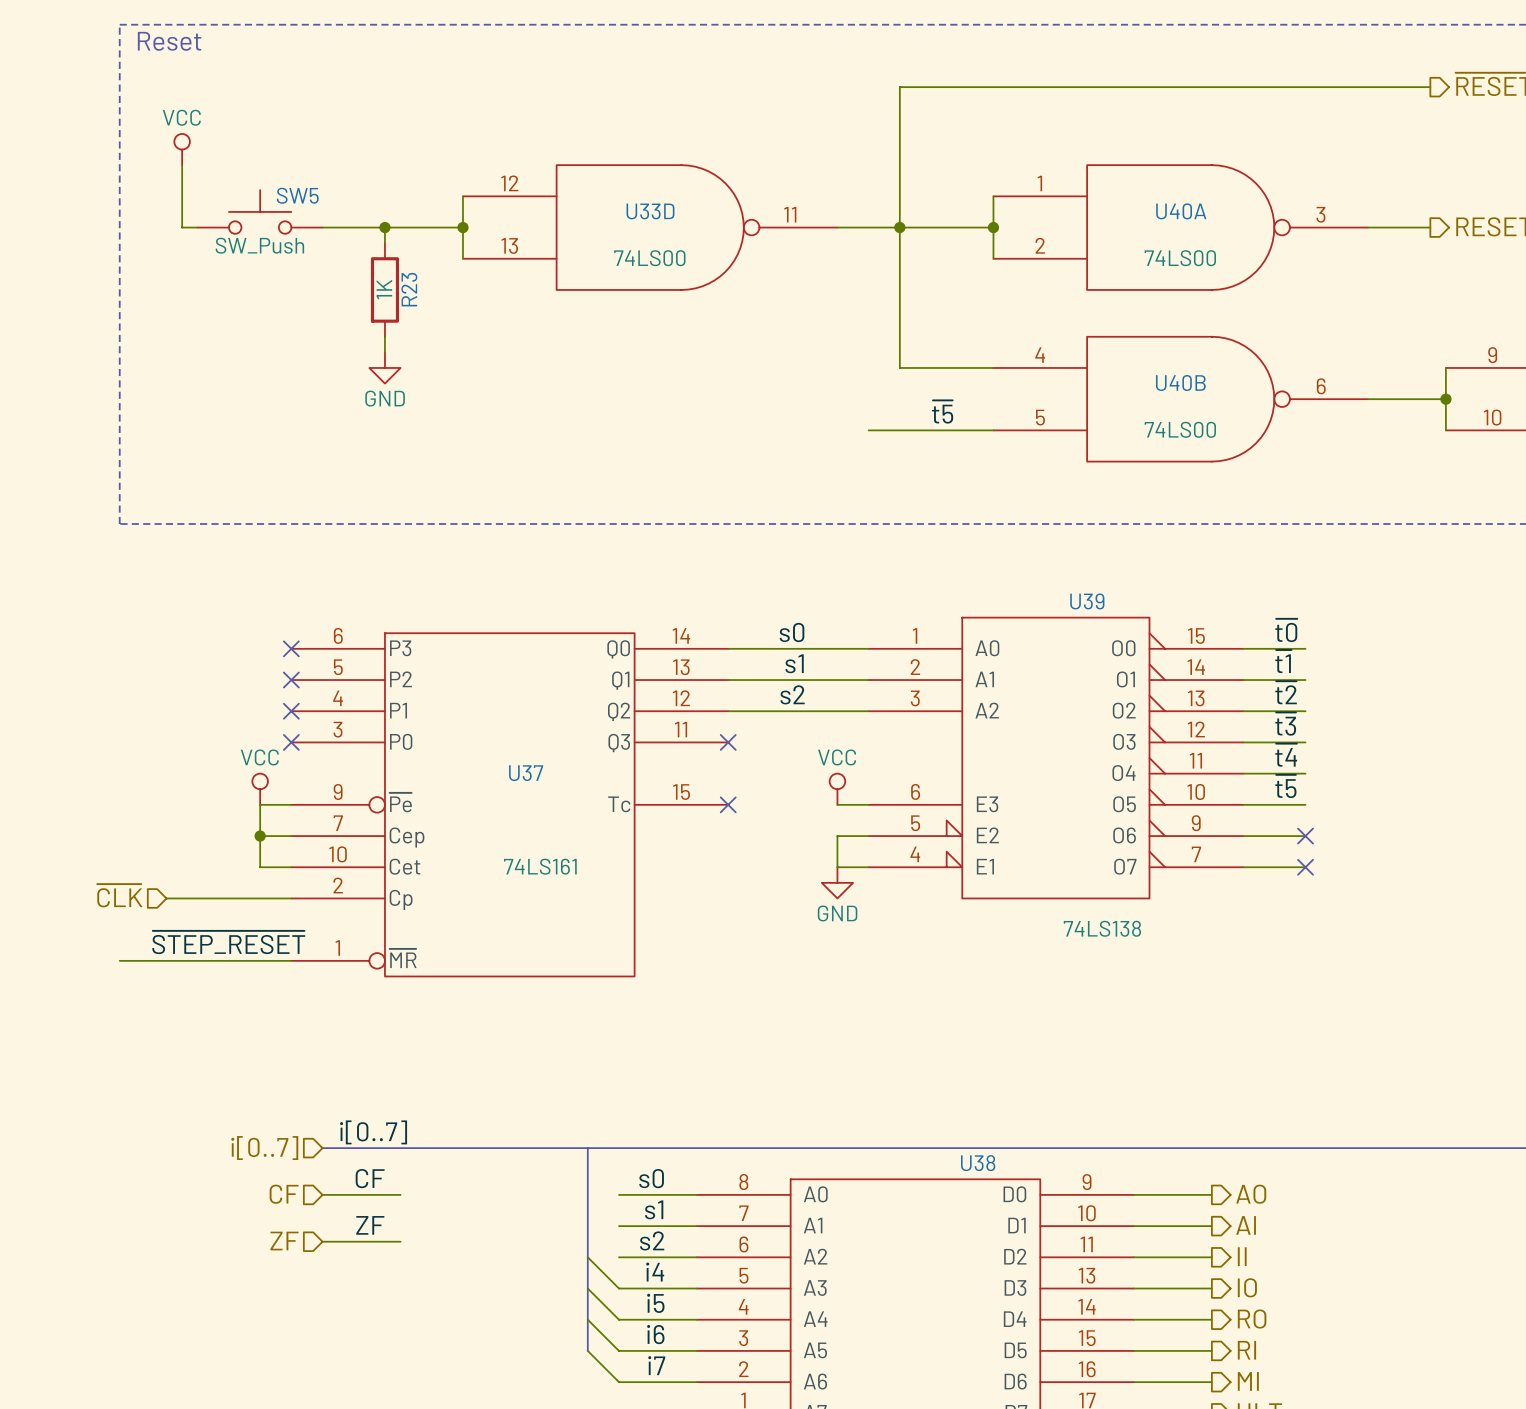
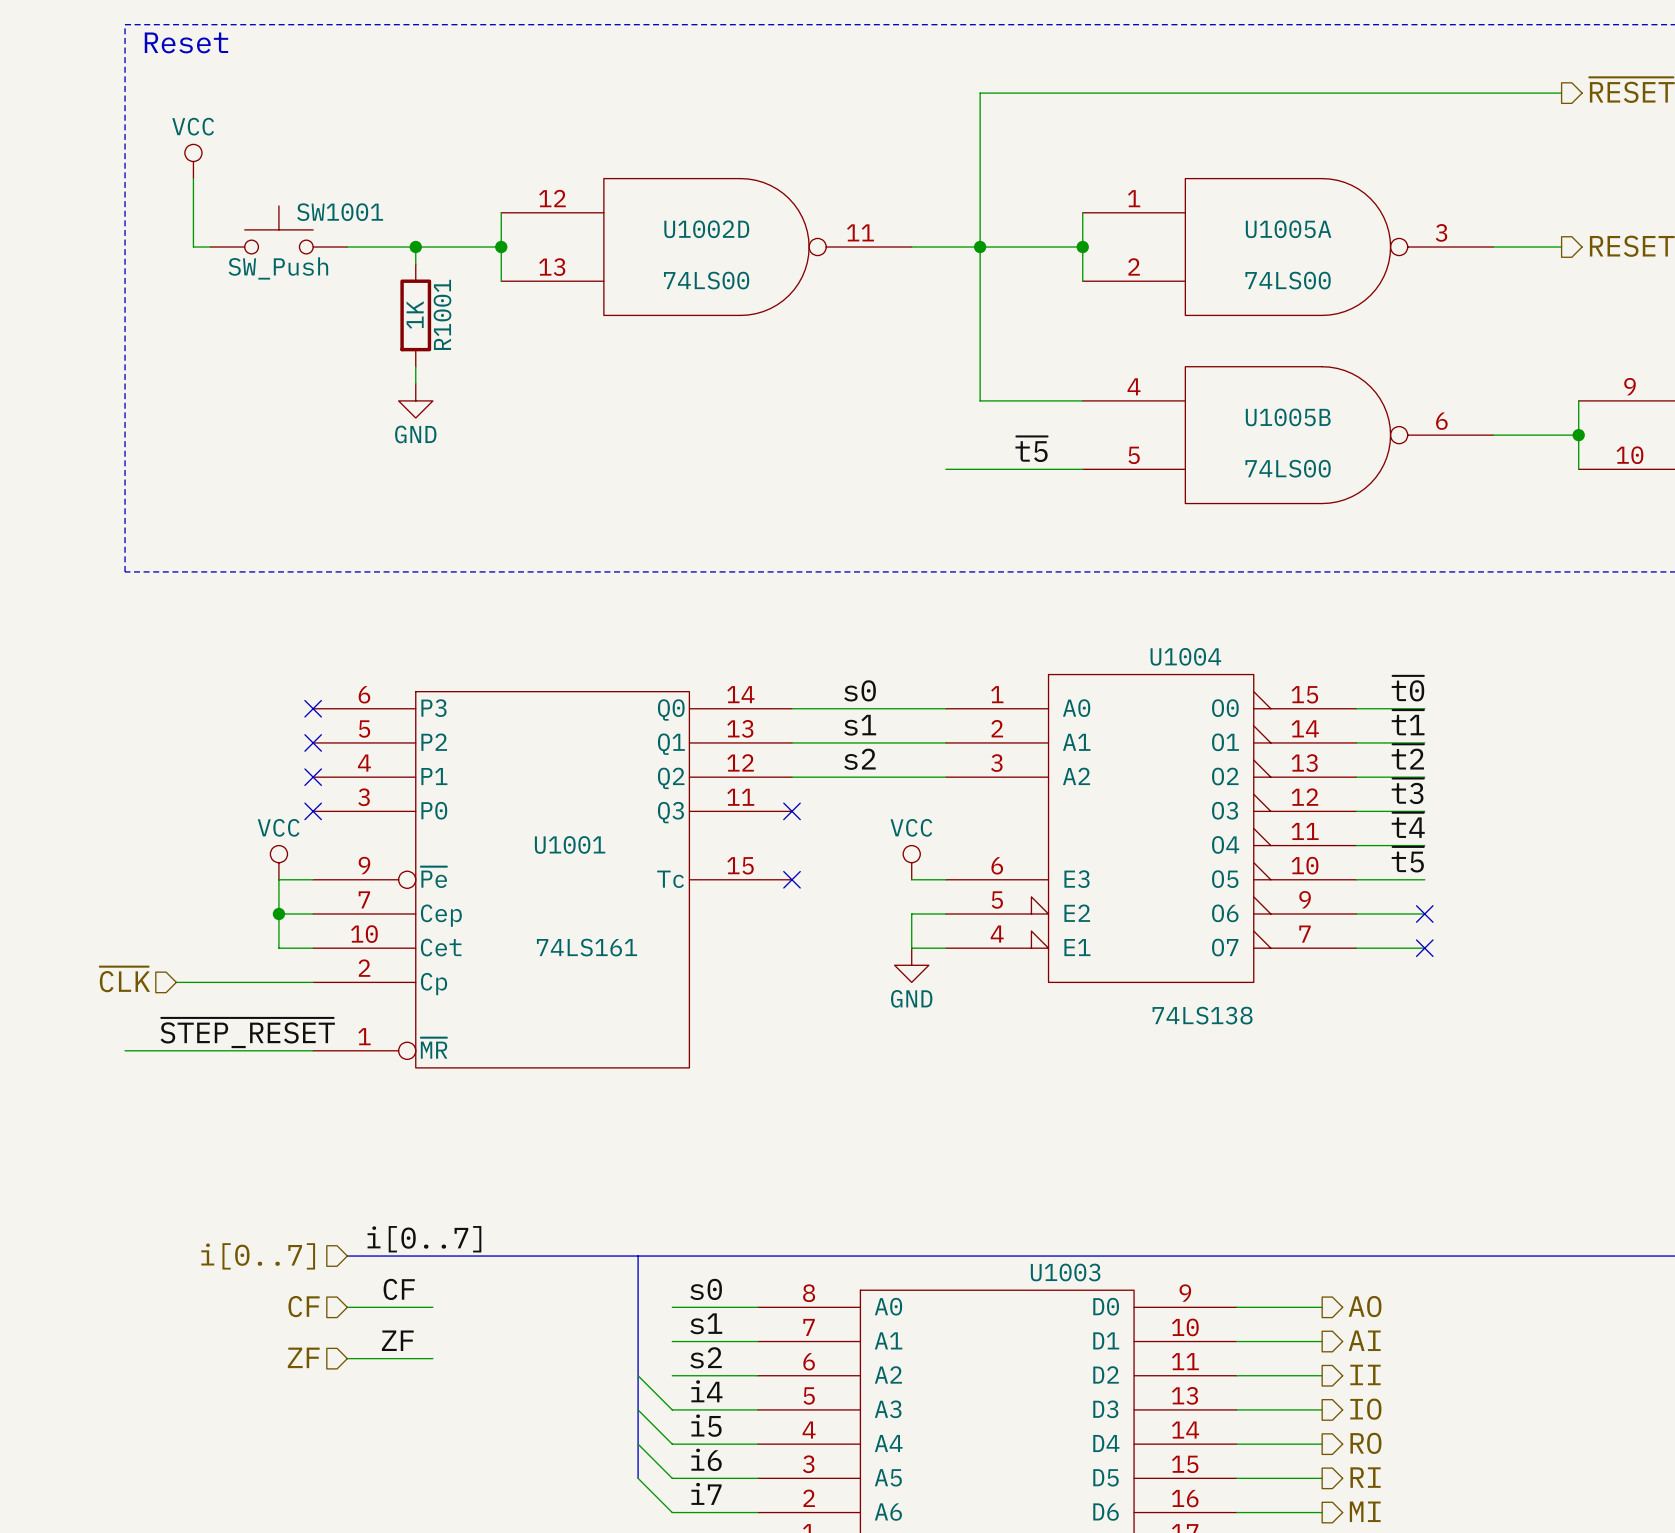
SW5 name: SW5 (297, 195) -> SW1001 (340, 212)
U33D name: U33D (650, 211) -> U1002D (706, 229)
U40A name: U40A (1181, 211) -> U1005A (1288, 229)
R23 name: R23 (409, 289) -> R1001 (442, 314)
U40B name: U40B (1180, 383) -> U1005B (1288, 417)
U39 name: U39 (1087, 601) -> U1004 (1185, 656)
U37 name: U37 (526, 773) -> U1001 (570, 844)
U38 name: U38 (978, 1163) -> U1003 (1065, 1272)

